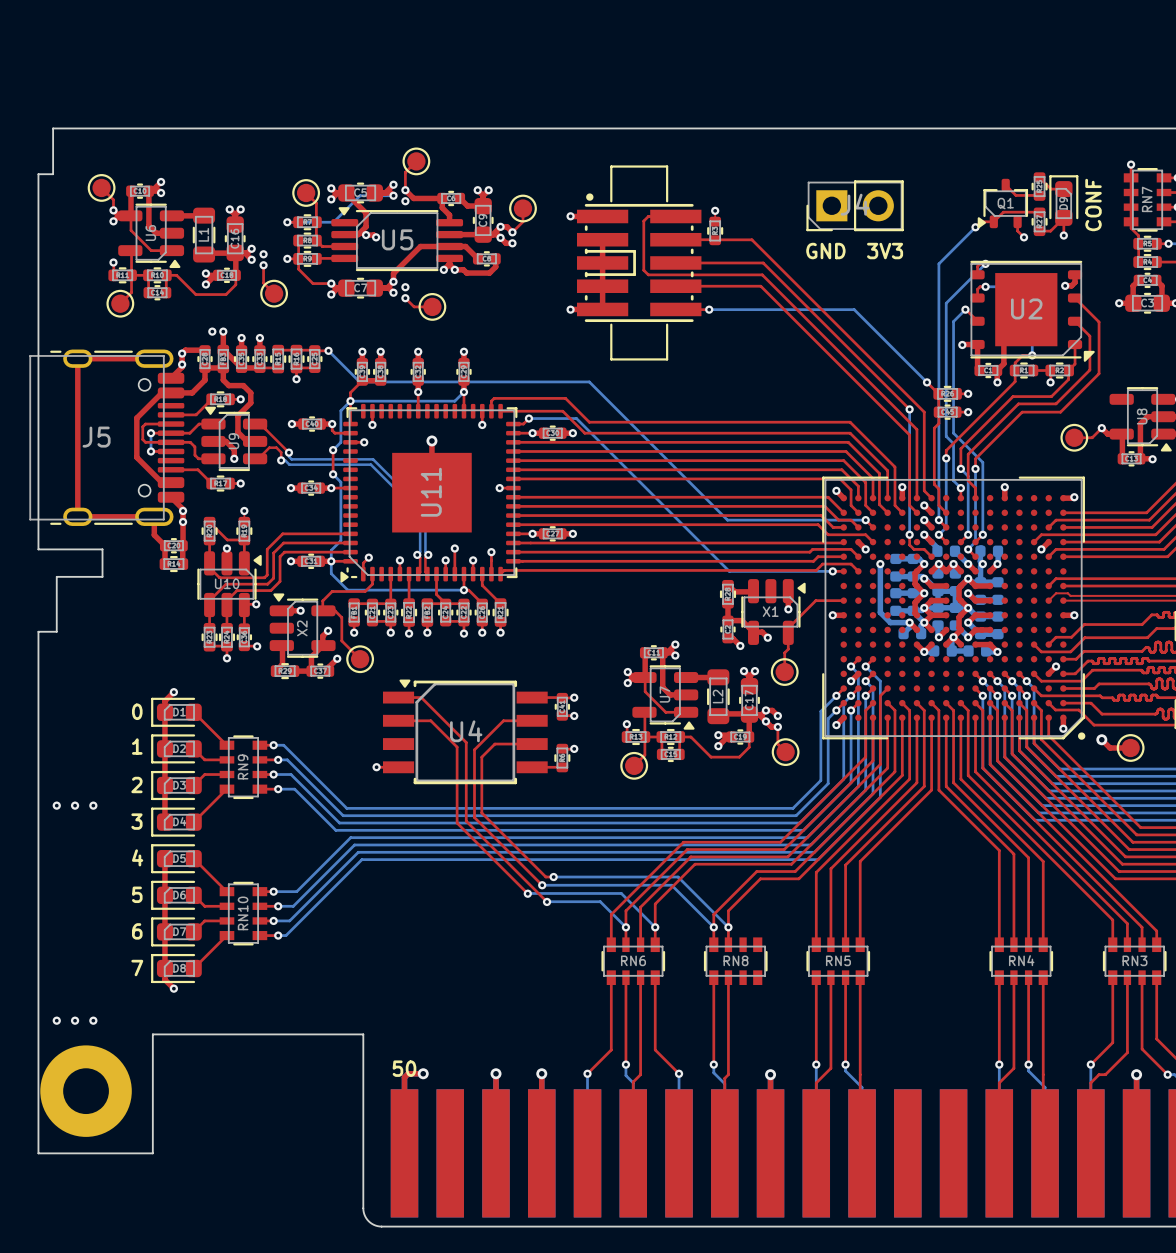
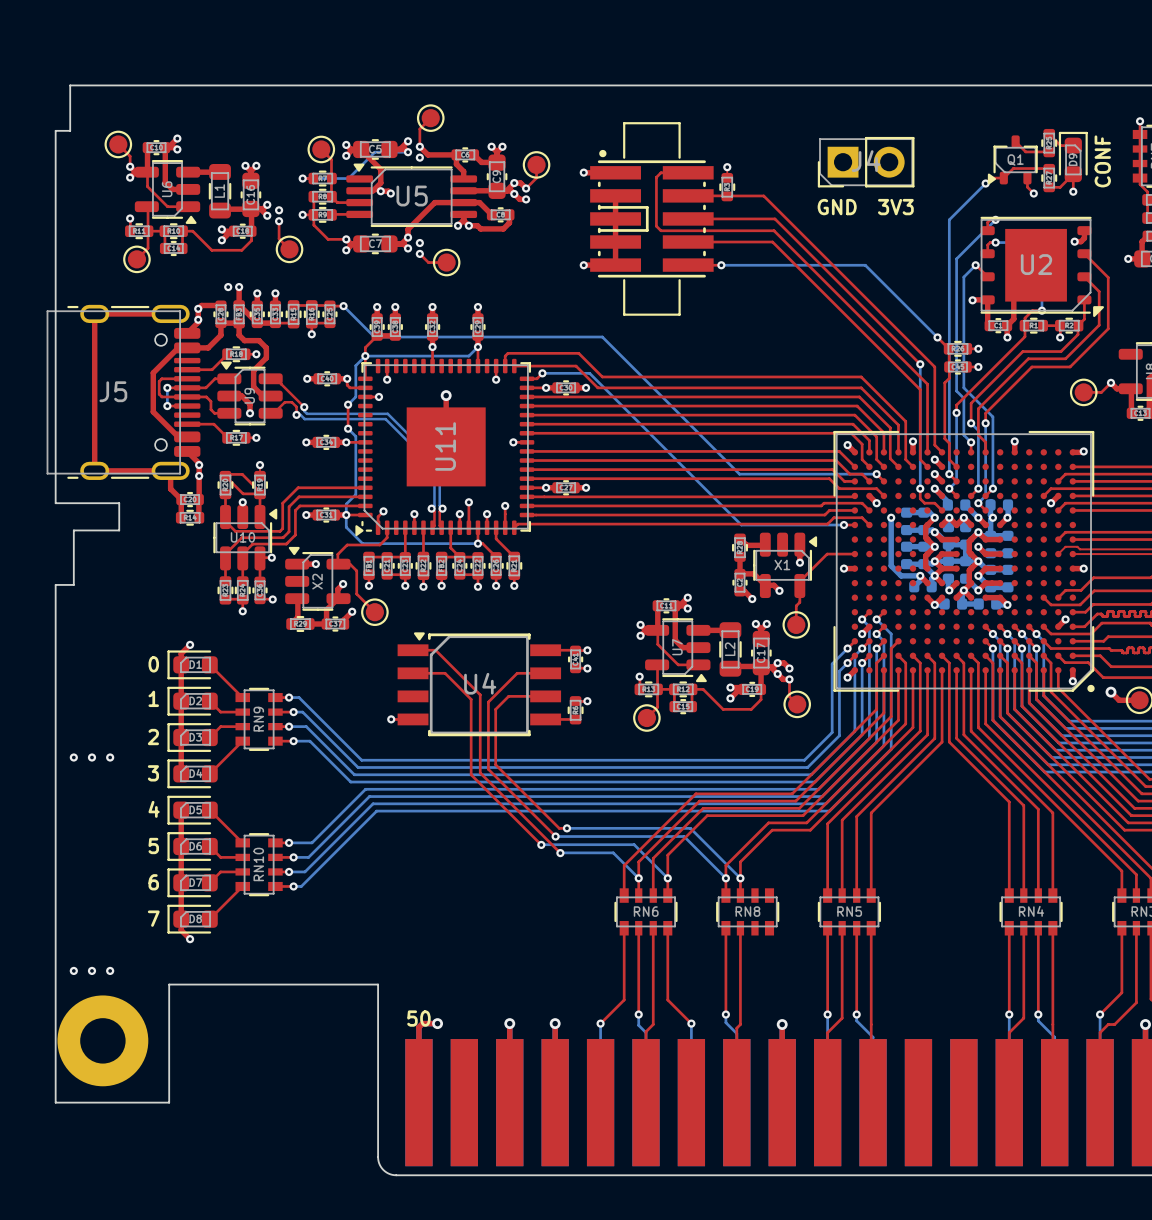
top track: none -> (225, 474) (242, 474) (260, 492)

